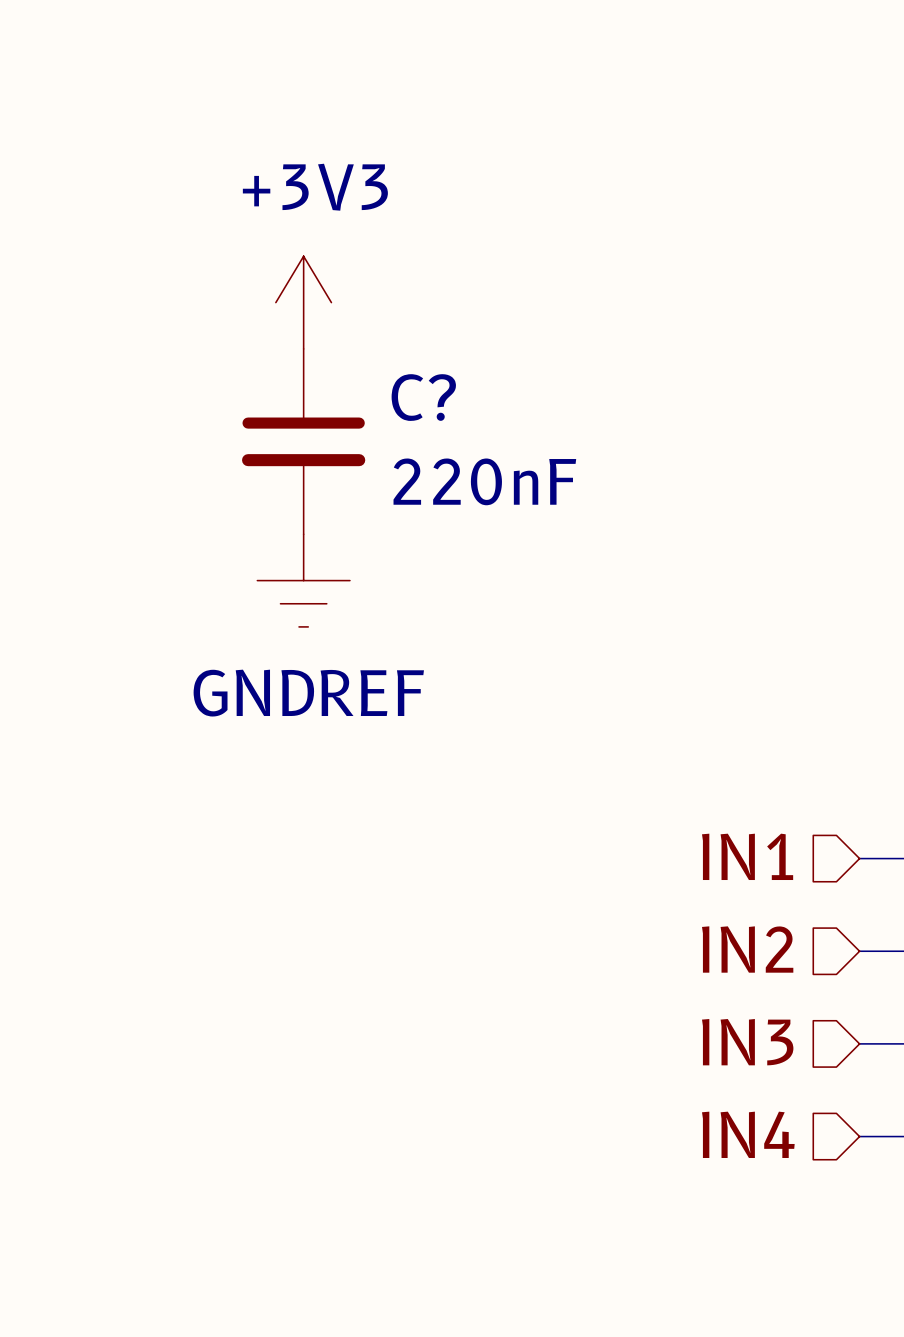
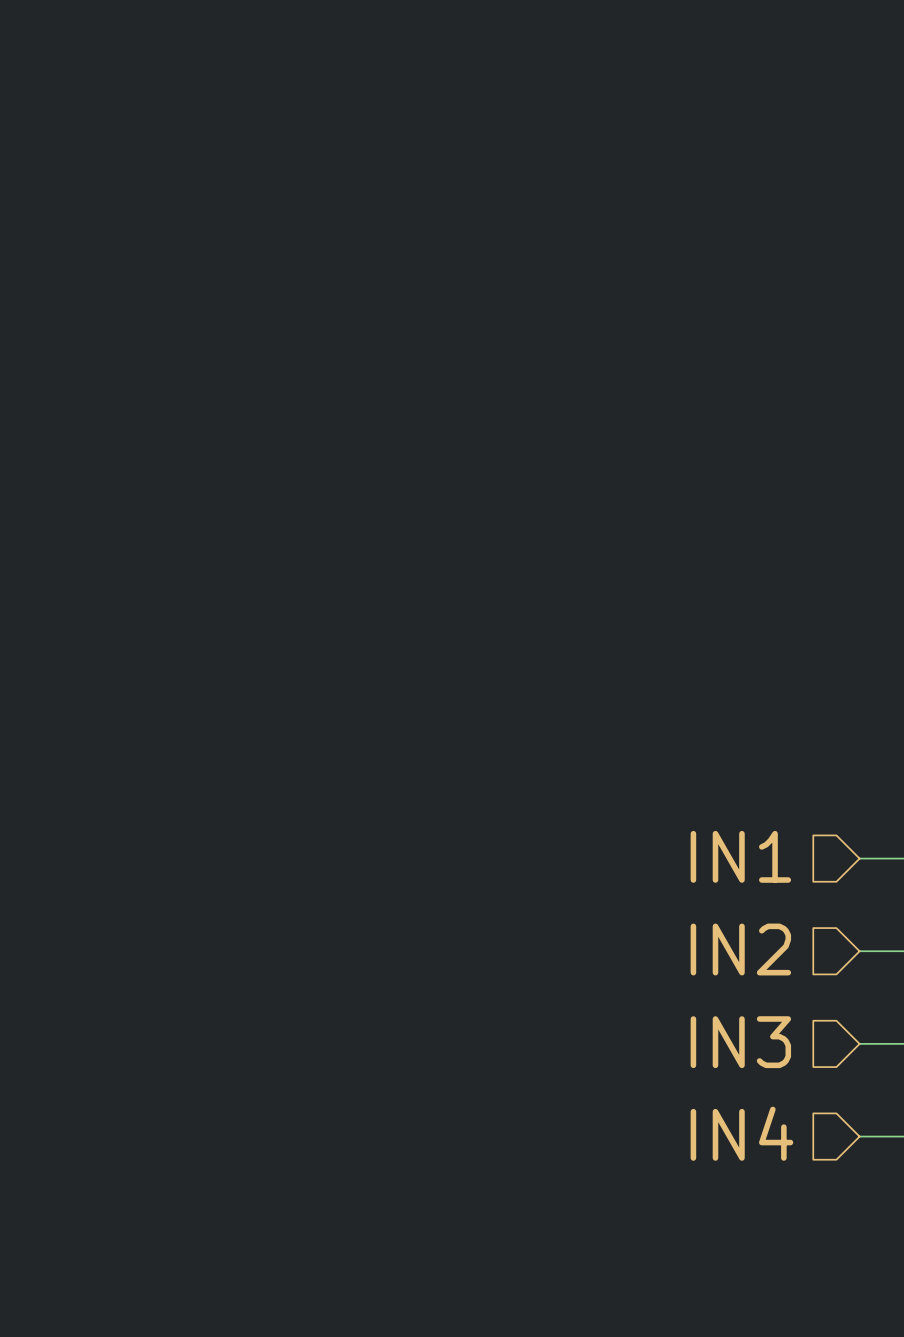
power symbol: +3V3 (303, 302) -> none
C?: 220nF (303, 441) -> none
power symbol: GNDREF (303, 580) -> none

